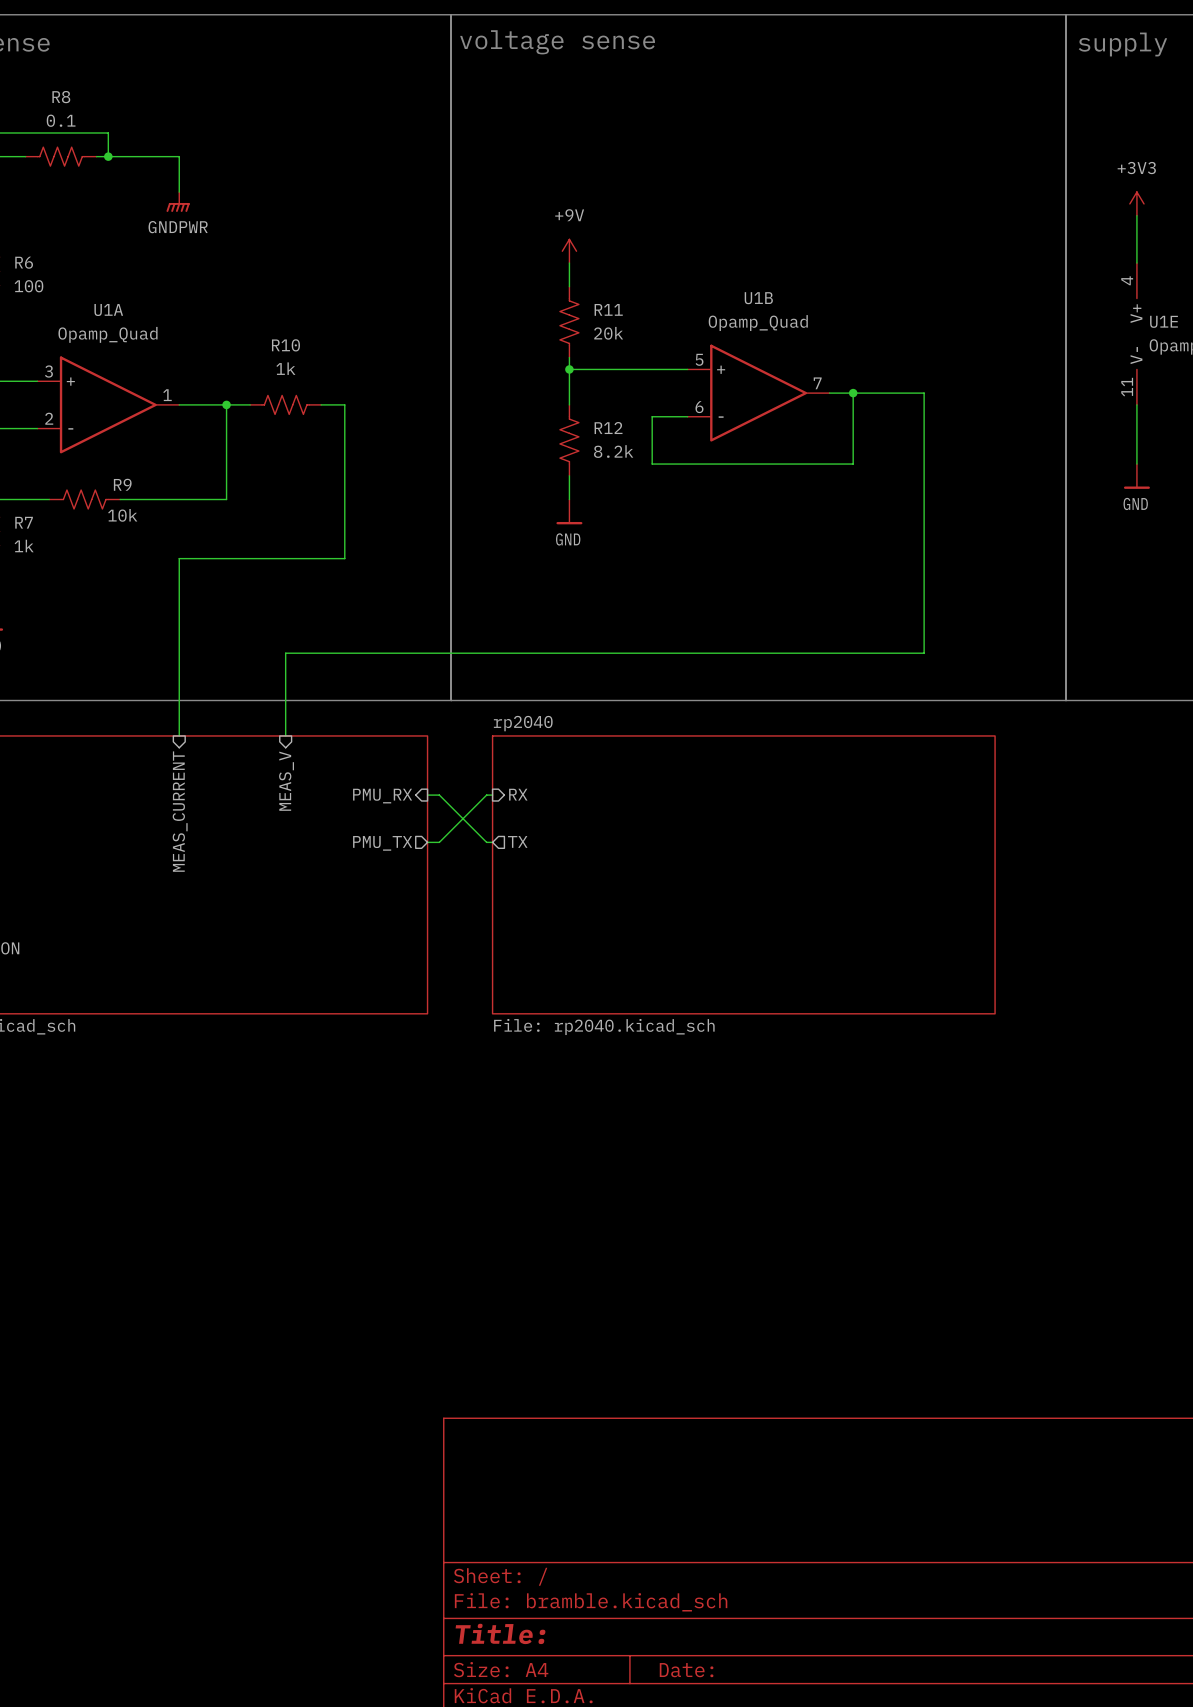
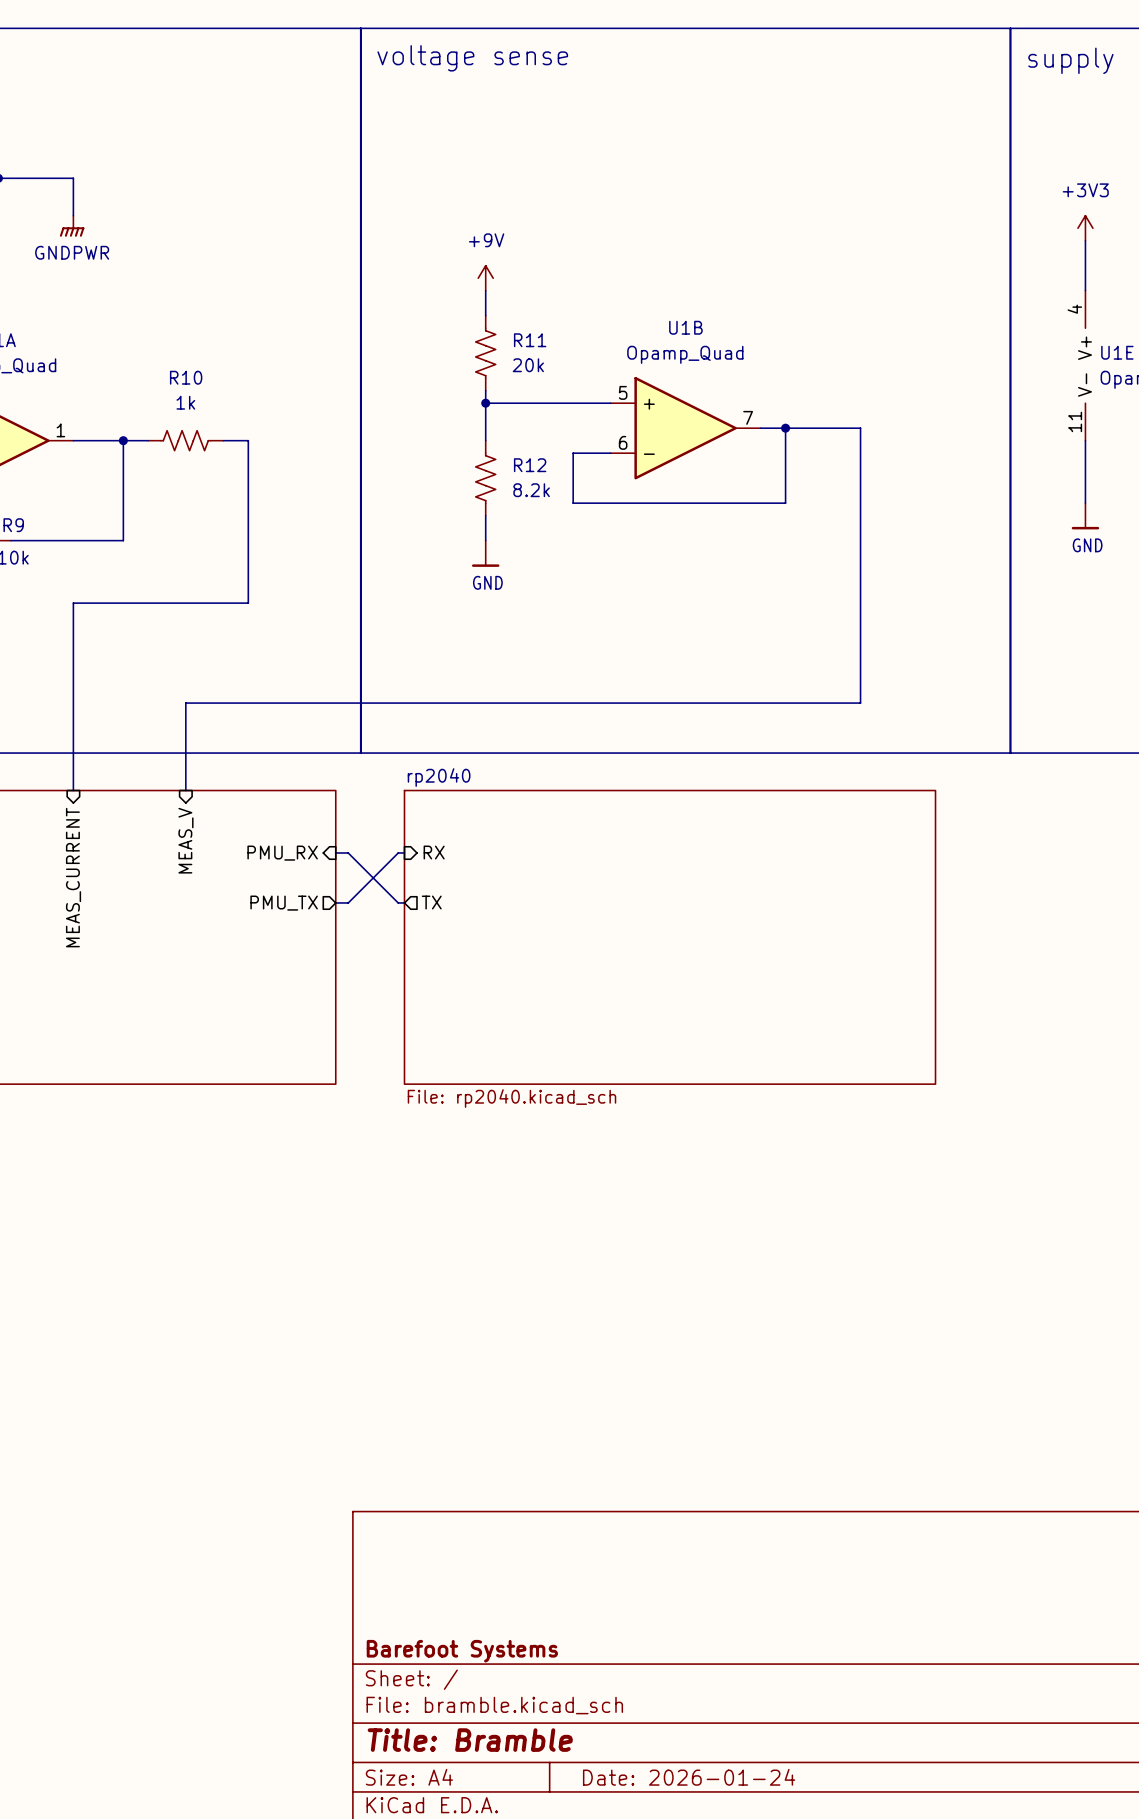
title block: none -> Barefoot Systems (462, 1651)
title block: Title: (500, 1633) -> Title: Bramble (470, 1740)
title block: Date: (686, 1670) -> Date: 2026-01-24 (689, 1777)

